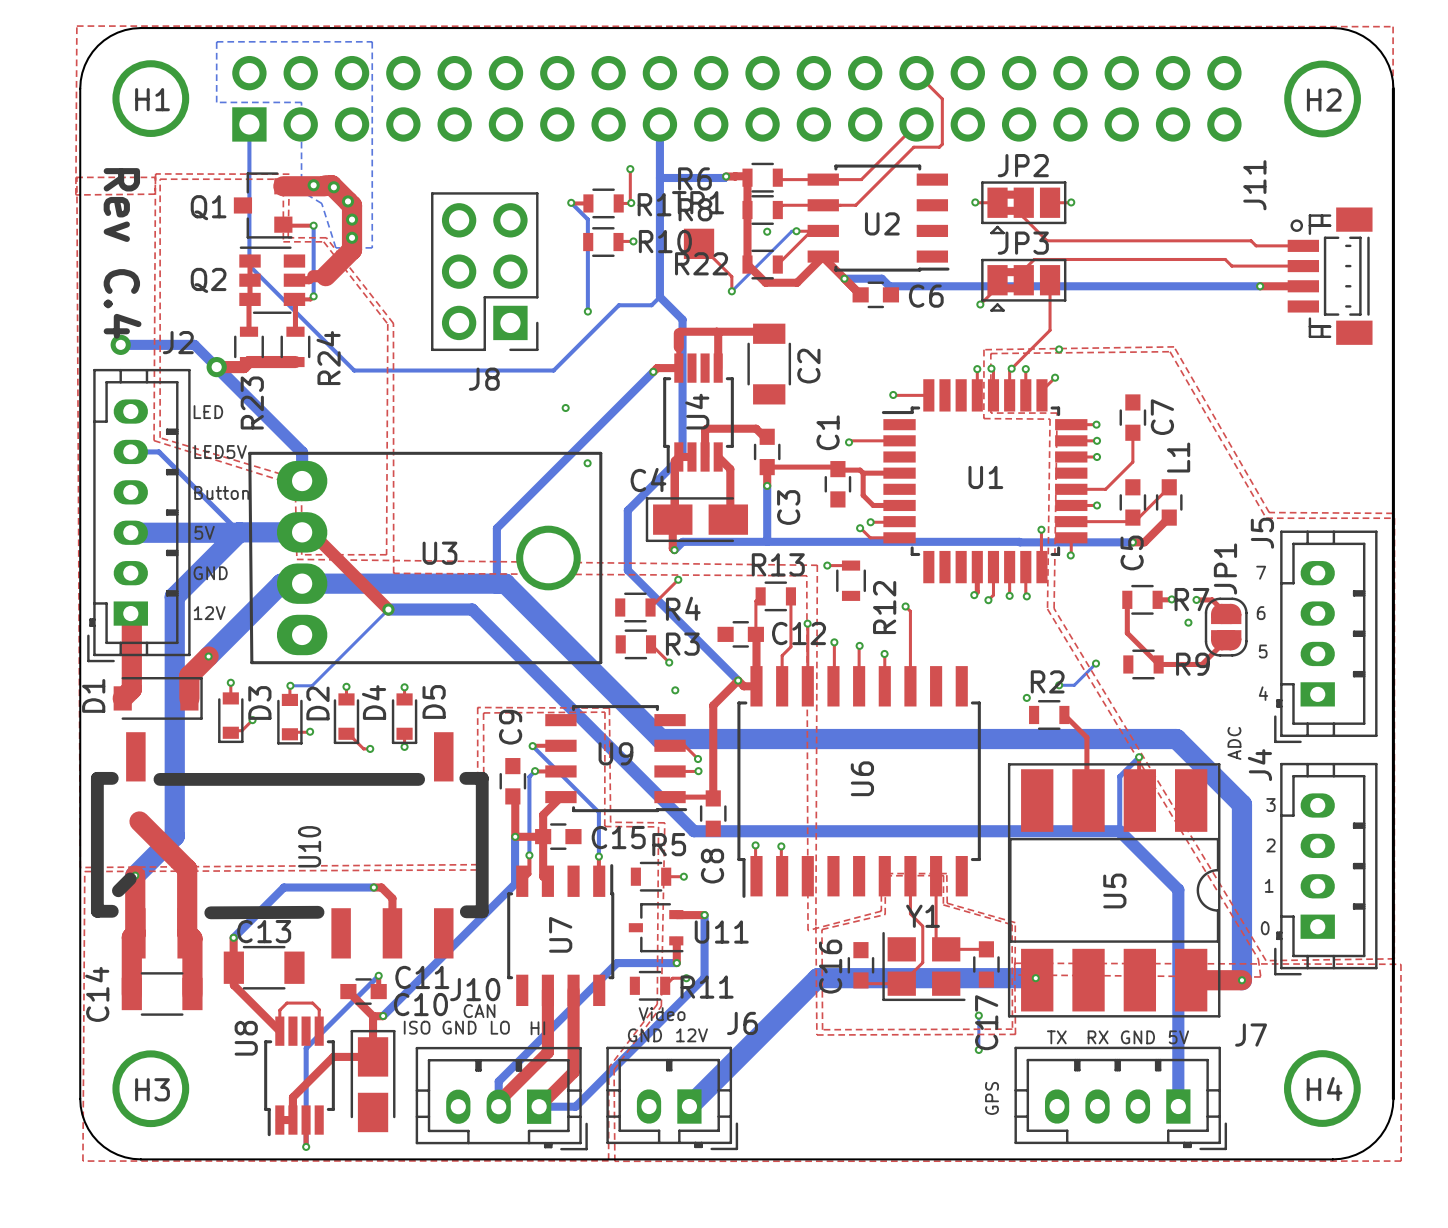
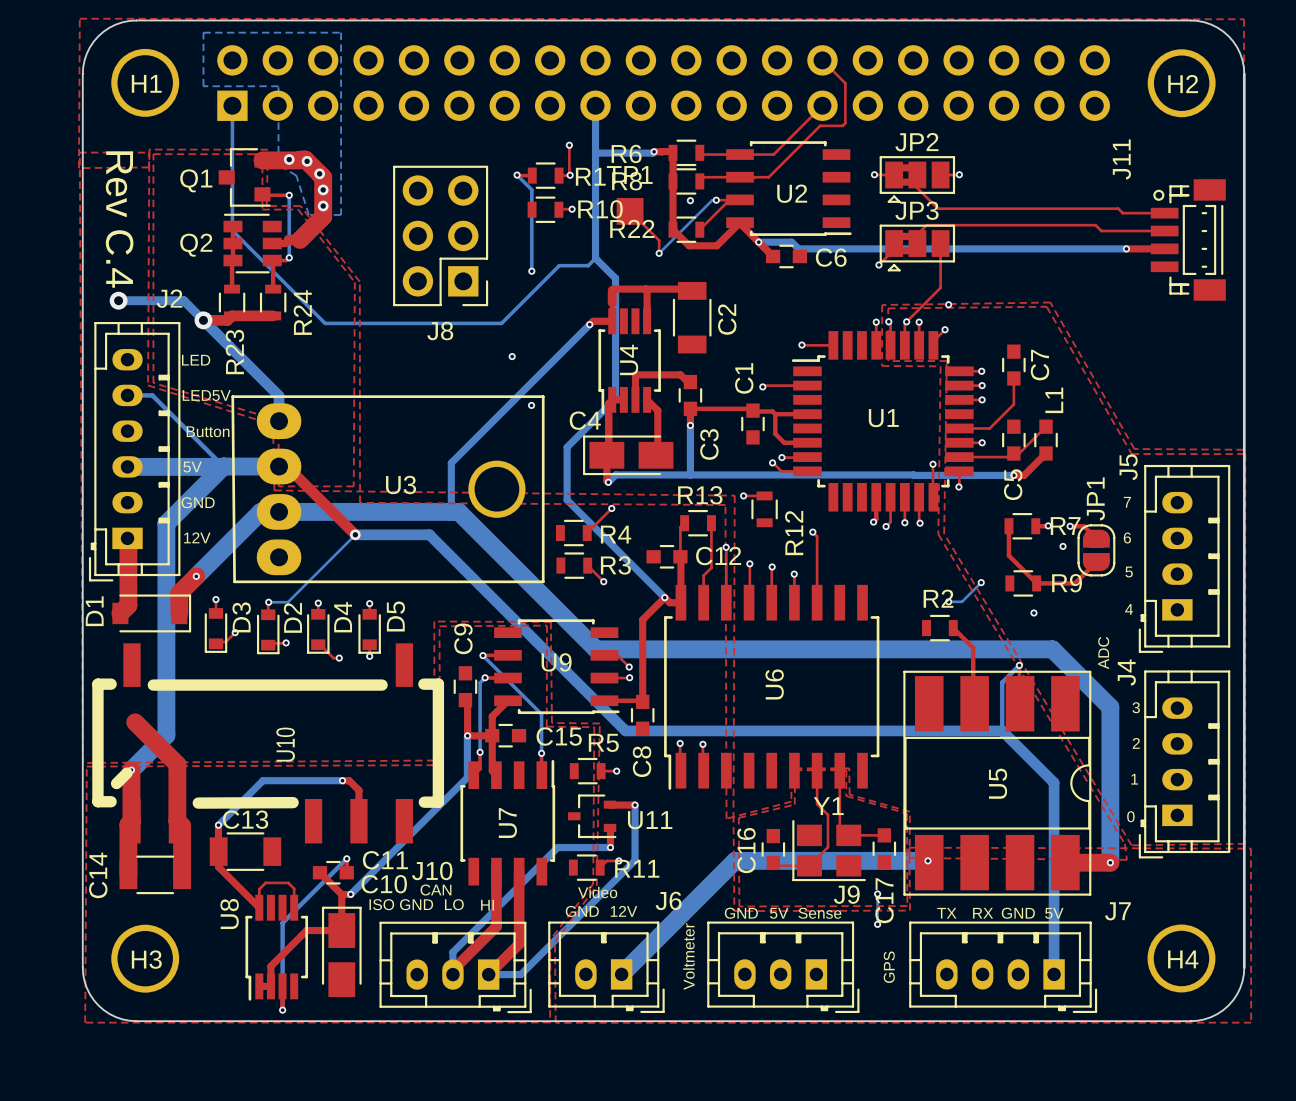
via: (675, 690) -> none
via: (1026, 697) -> none
via: none -> (1033, 612)
text: none -> GND (741, 913)
text: none -> 5V (779, 913)
text: none -> Sense (819, 913)
text: none -> Voltmeter (688, 956)
J9: none -> (783, 967)

